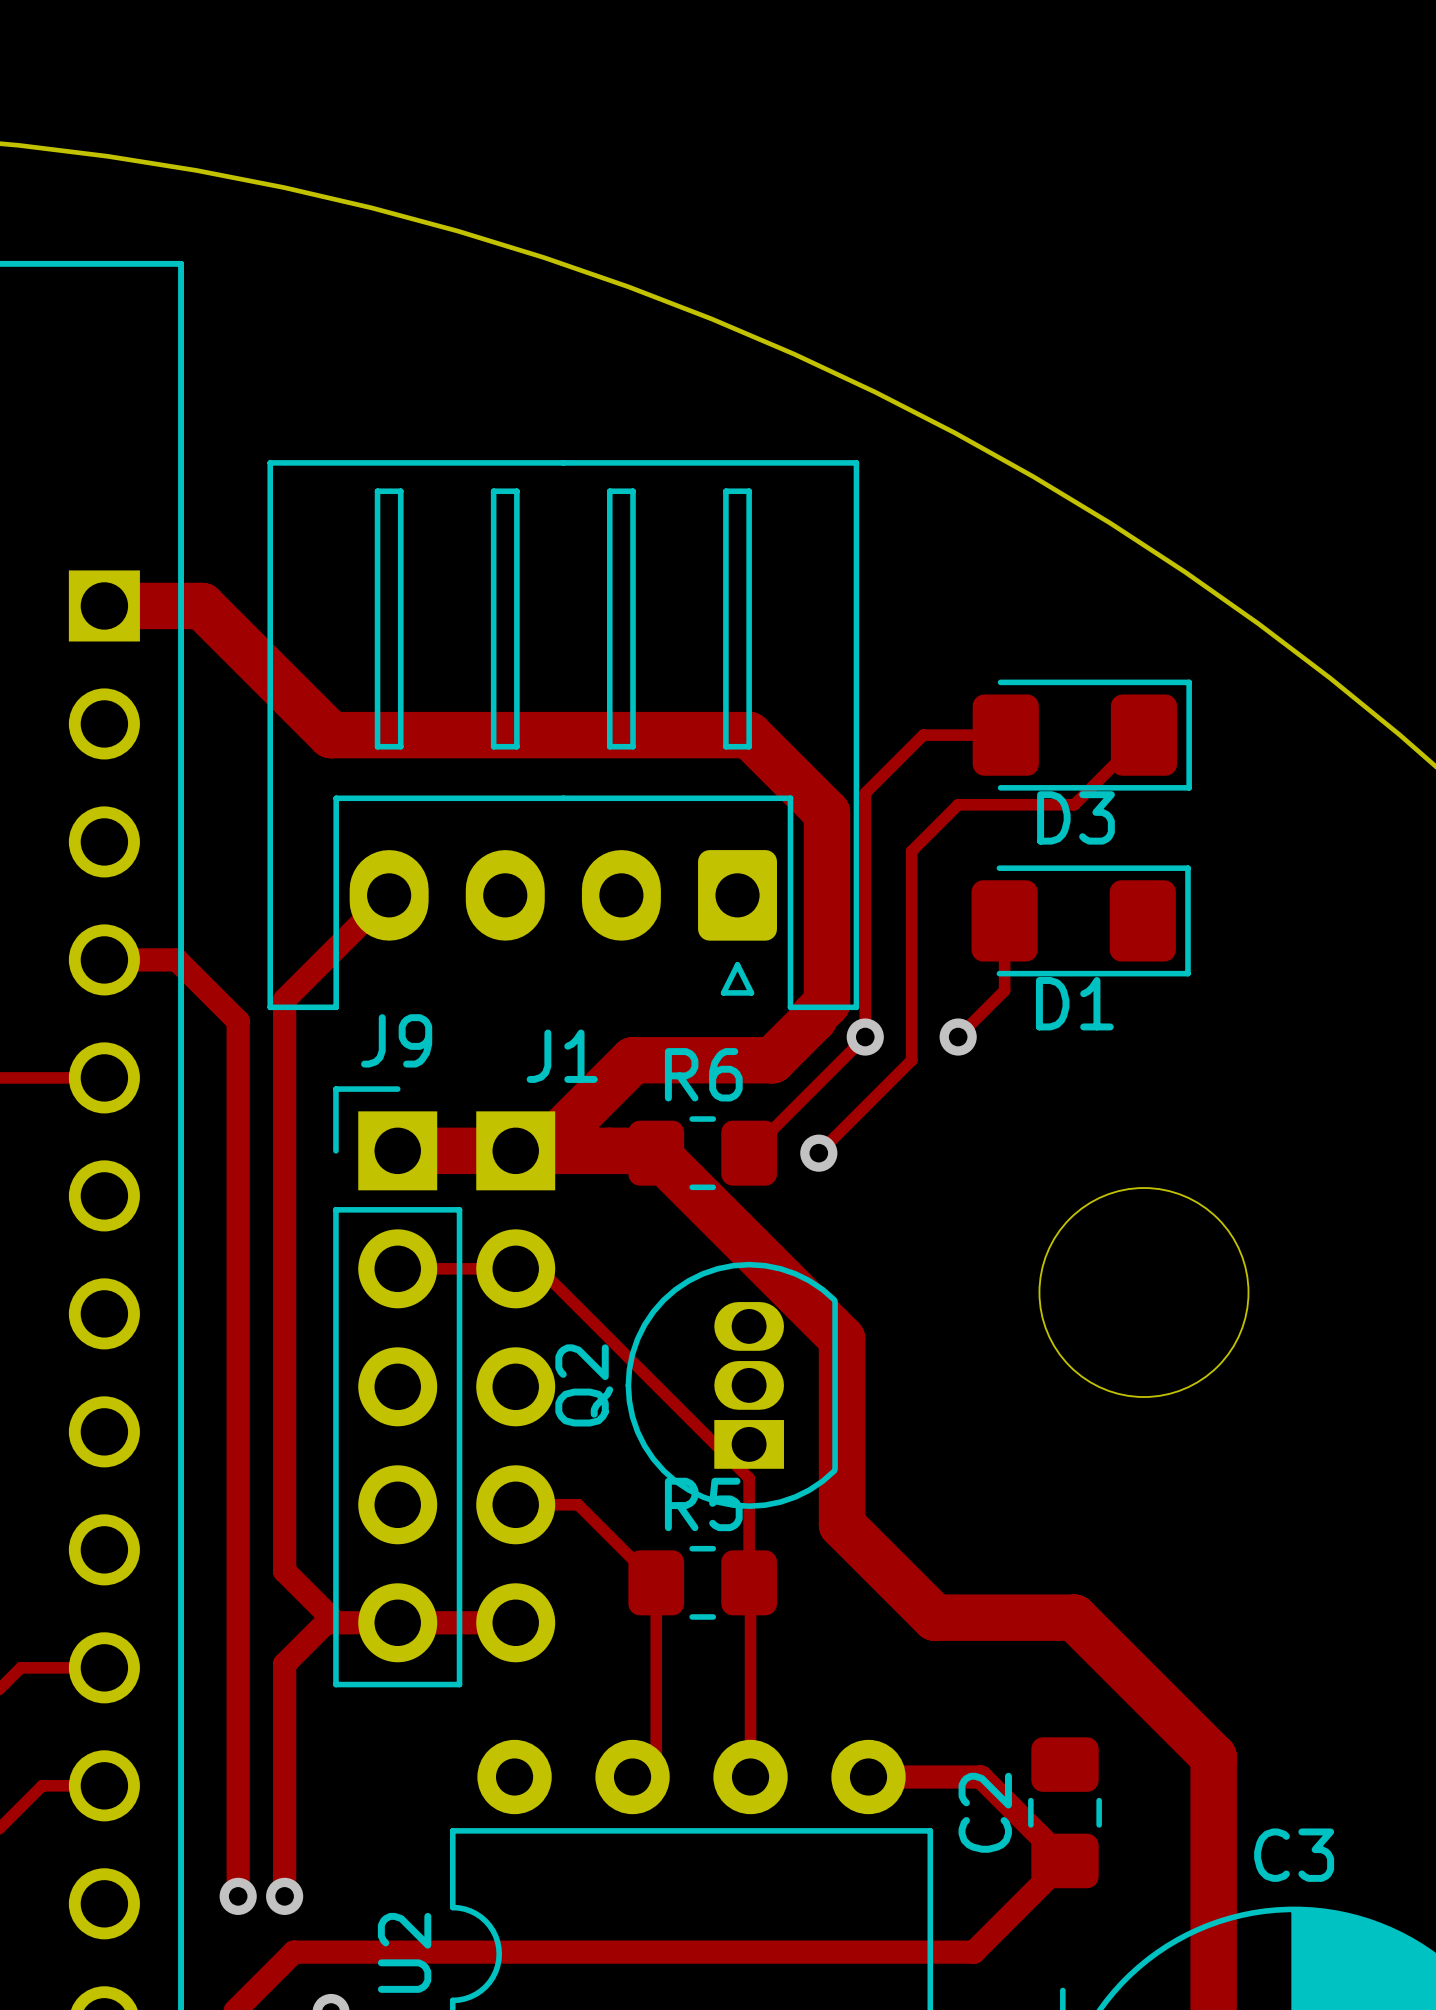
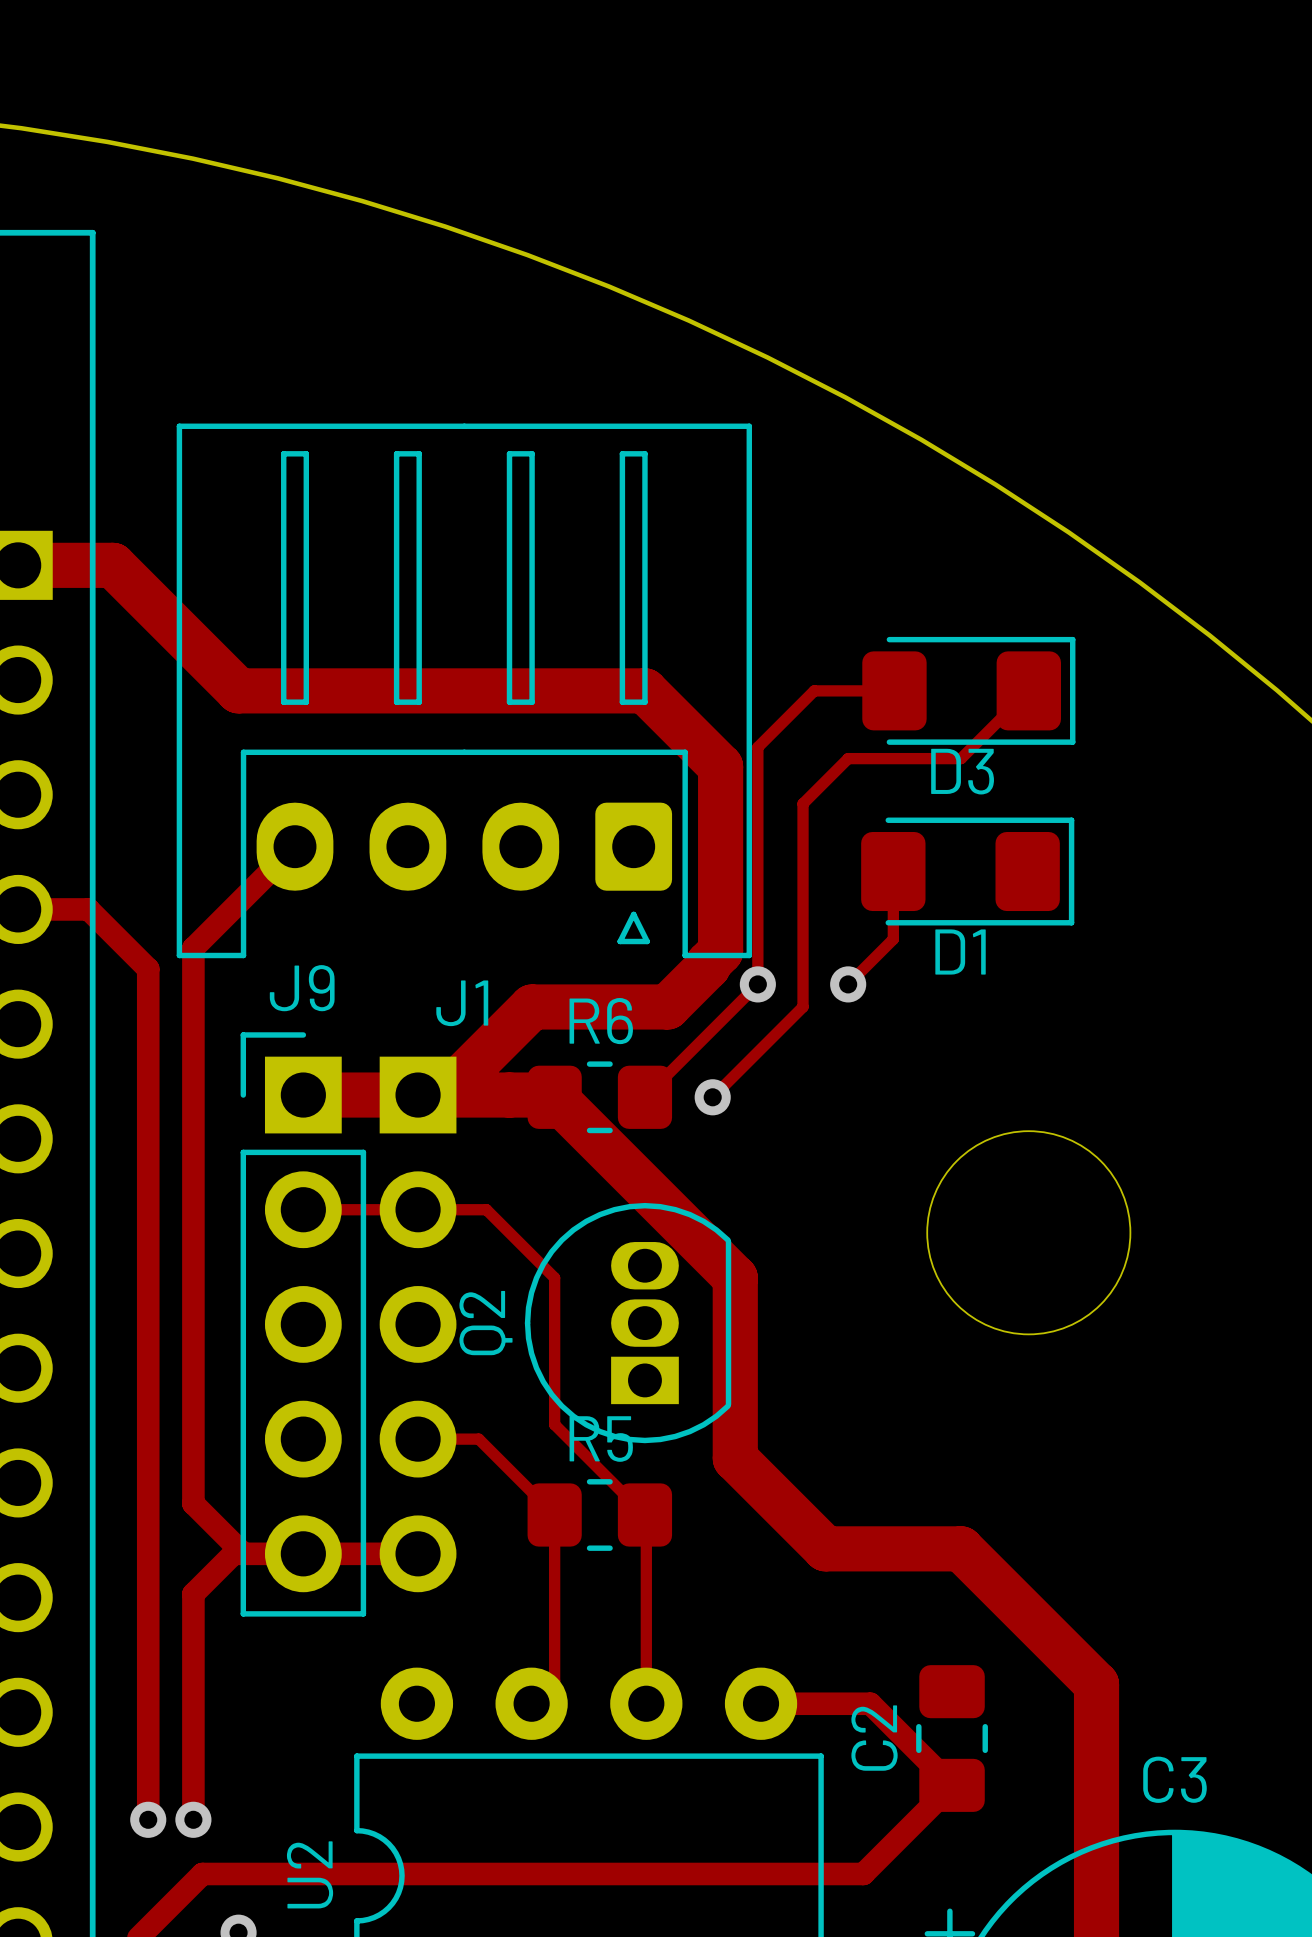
track: (539, 1268) (749, 1478) (749, 1582) -> (441, 1209) (486, 1209) (554, 1277) (554, 1424) (646, 1516) (646, 1527)

